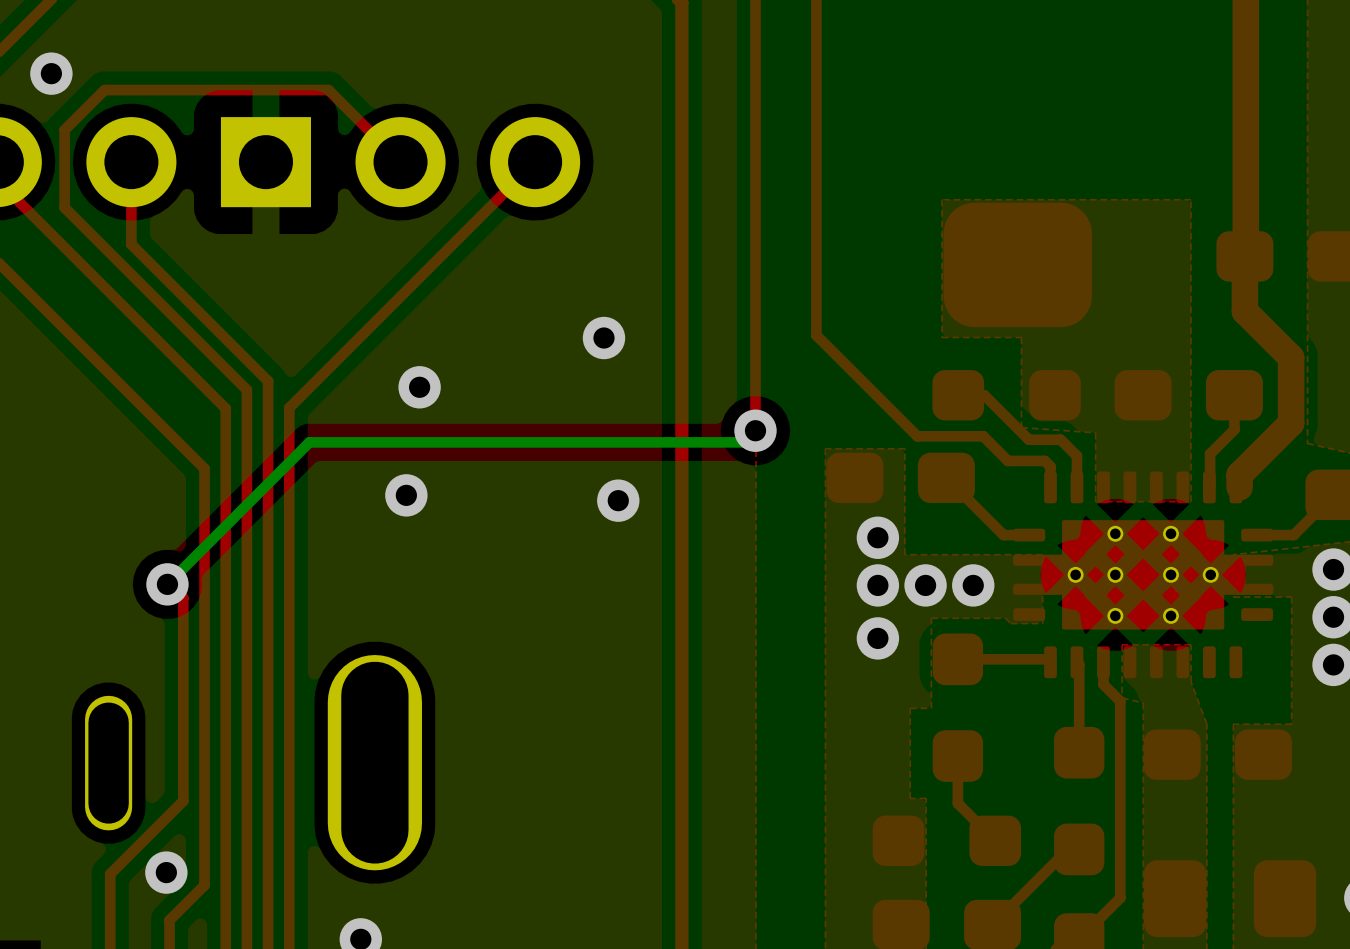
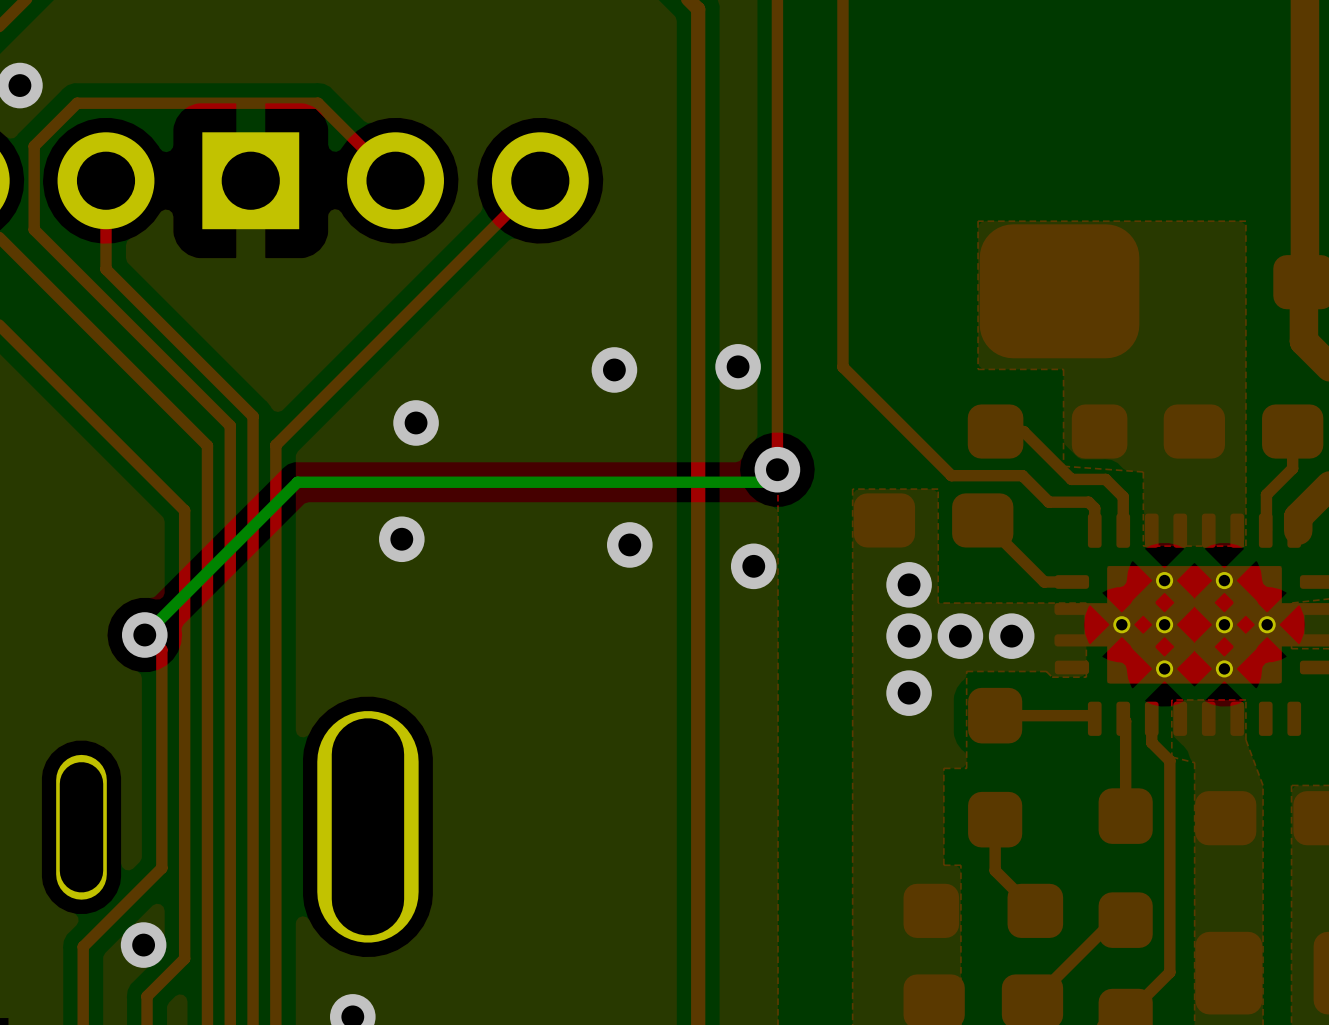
via: none -> (738, 366)
via: none -> (753, 566)

